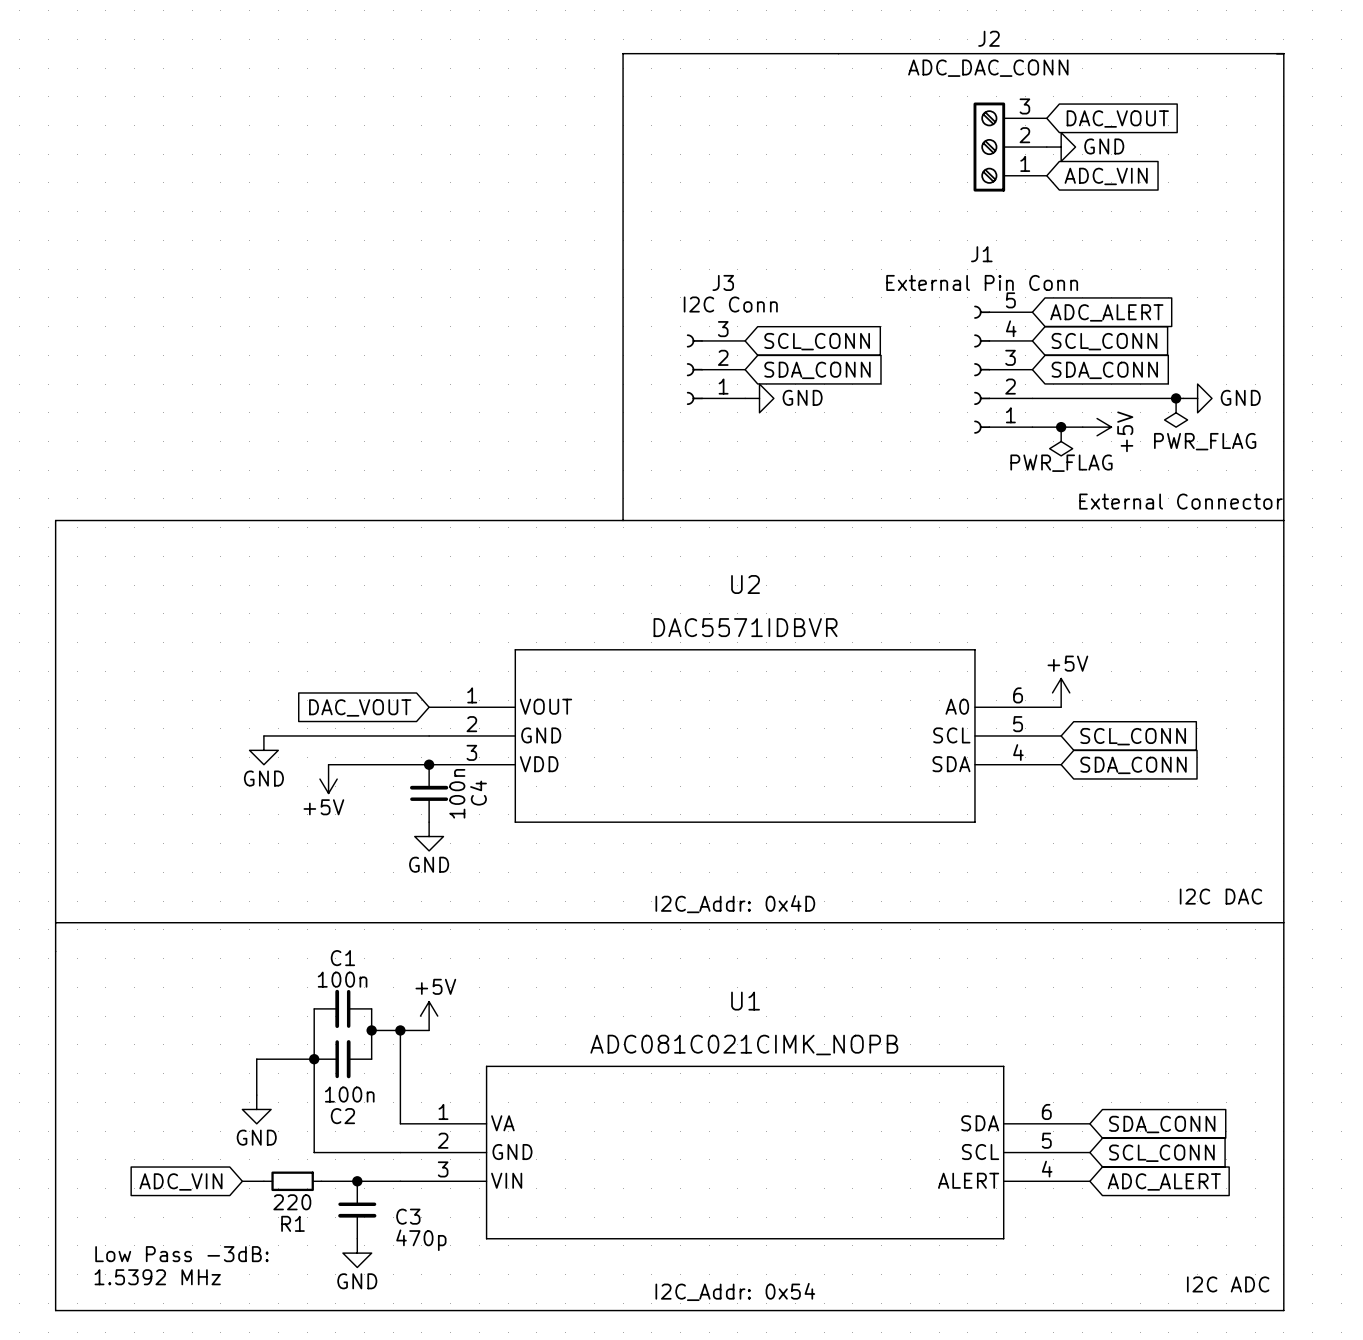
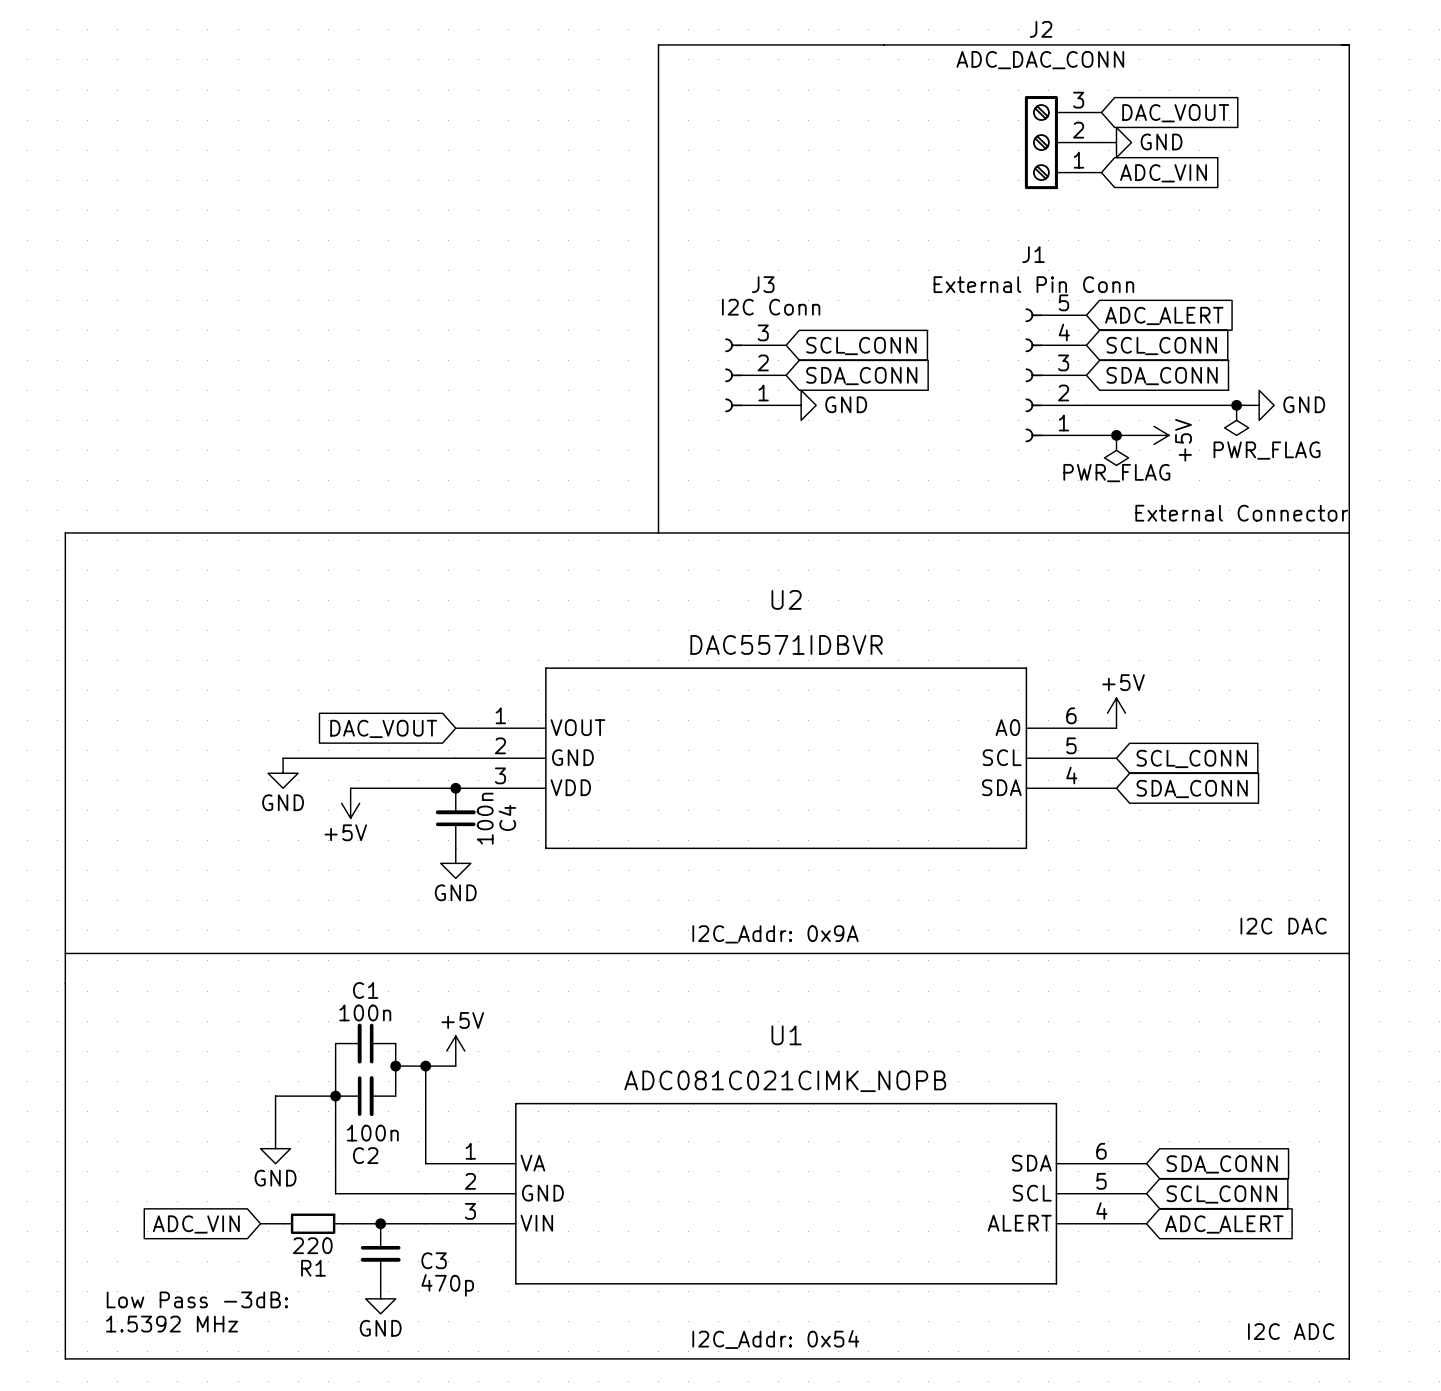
text: I2C_Addr: 0x4D (735, 904) -> I2C_Addr: 0x9A (775, 934)

